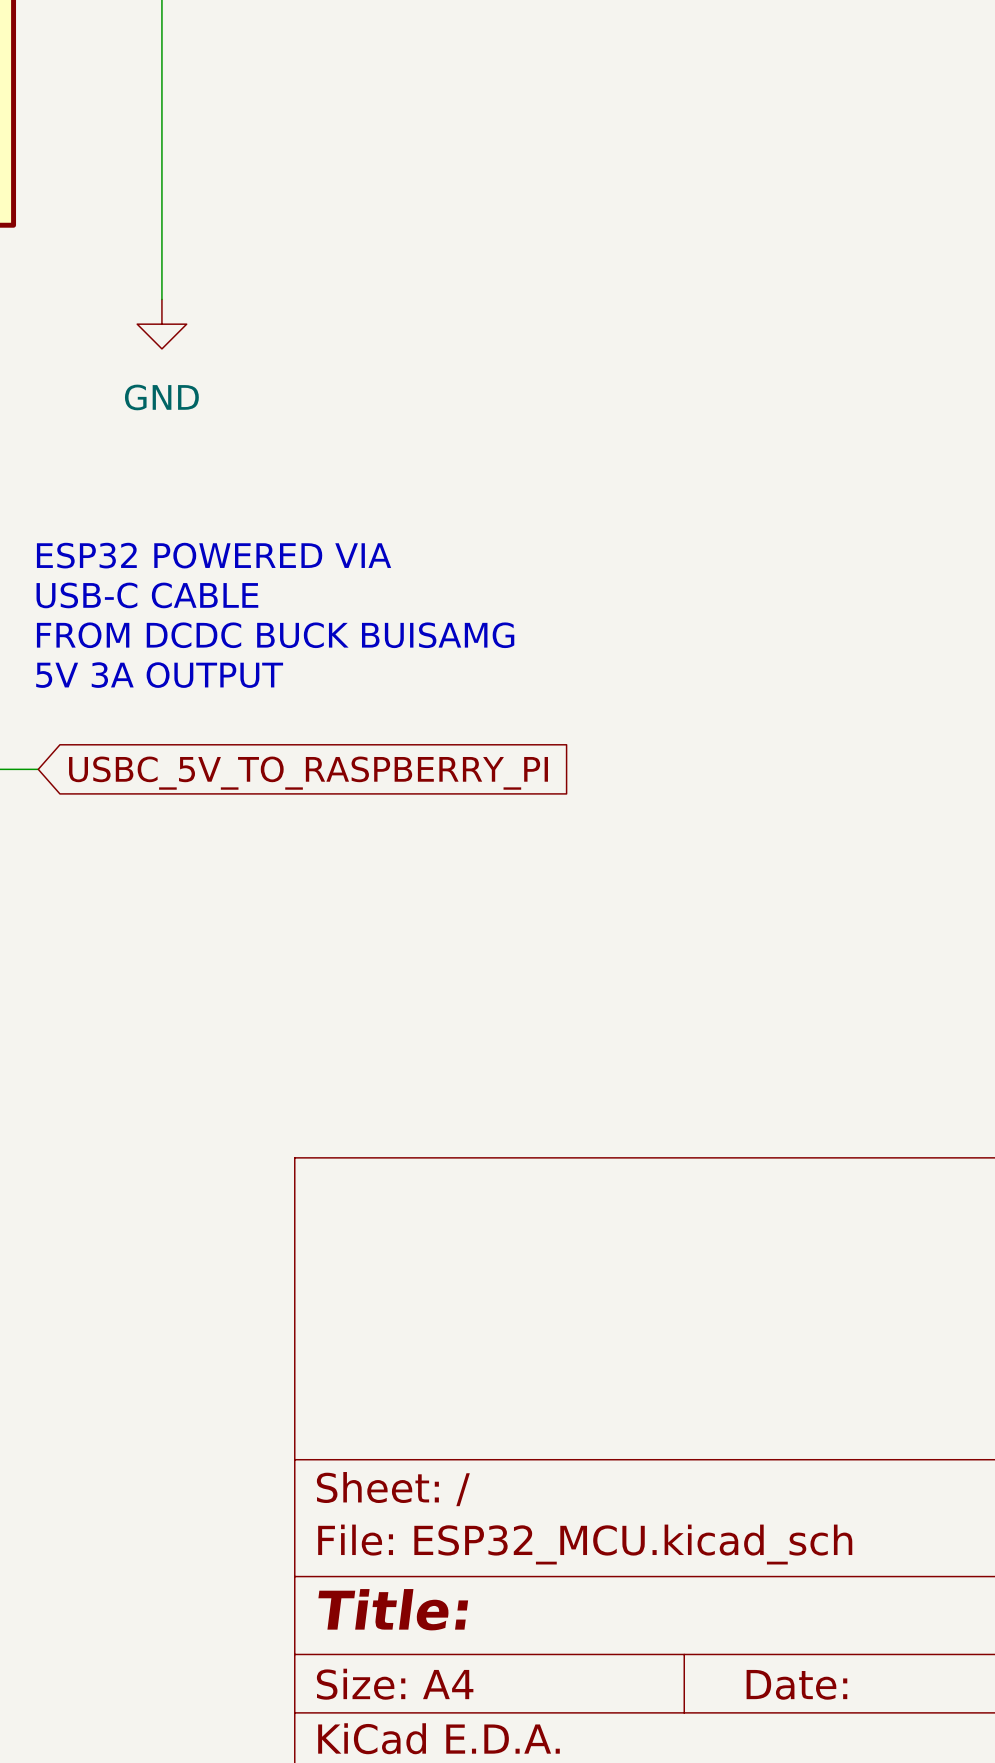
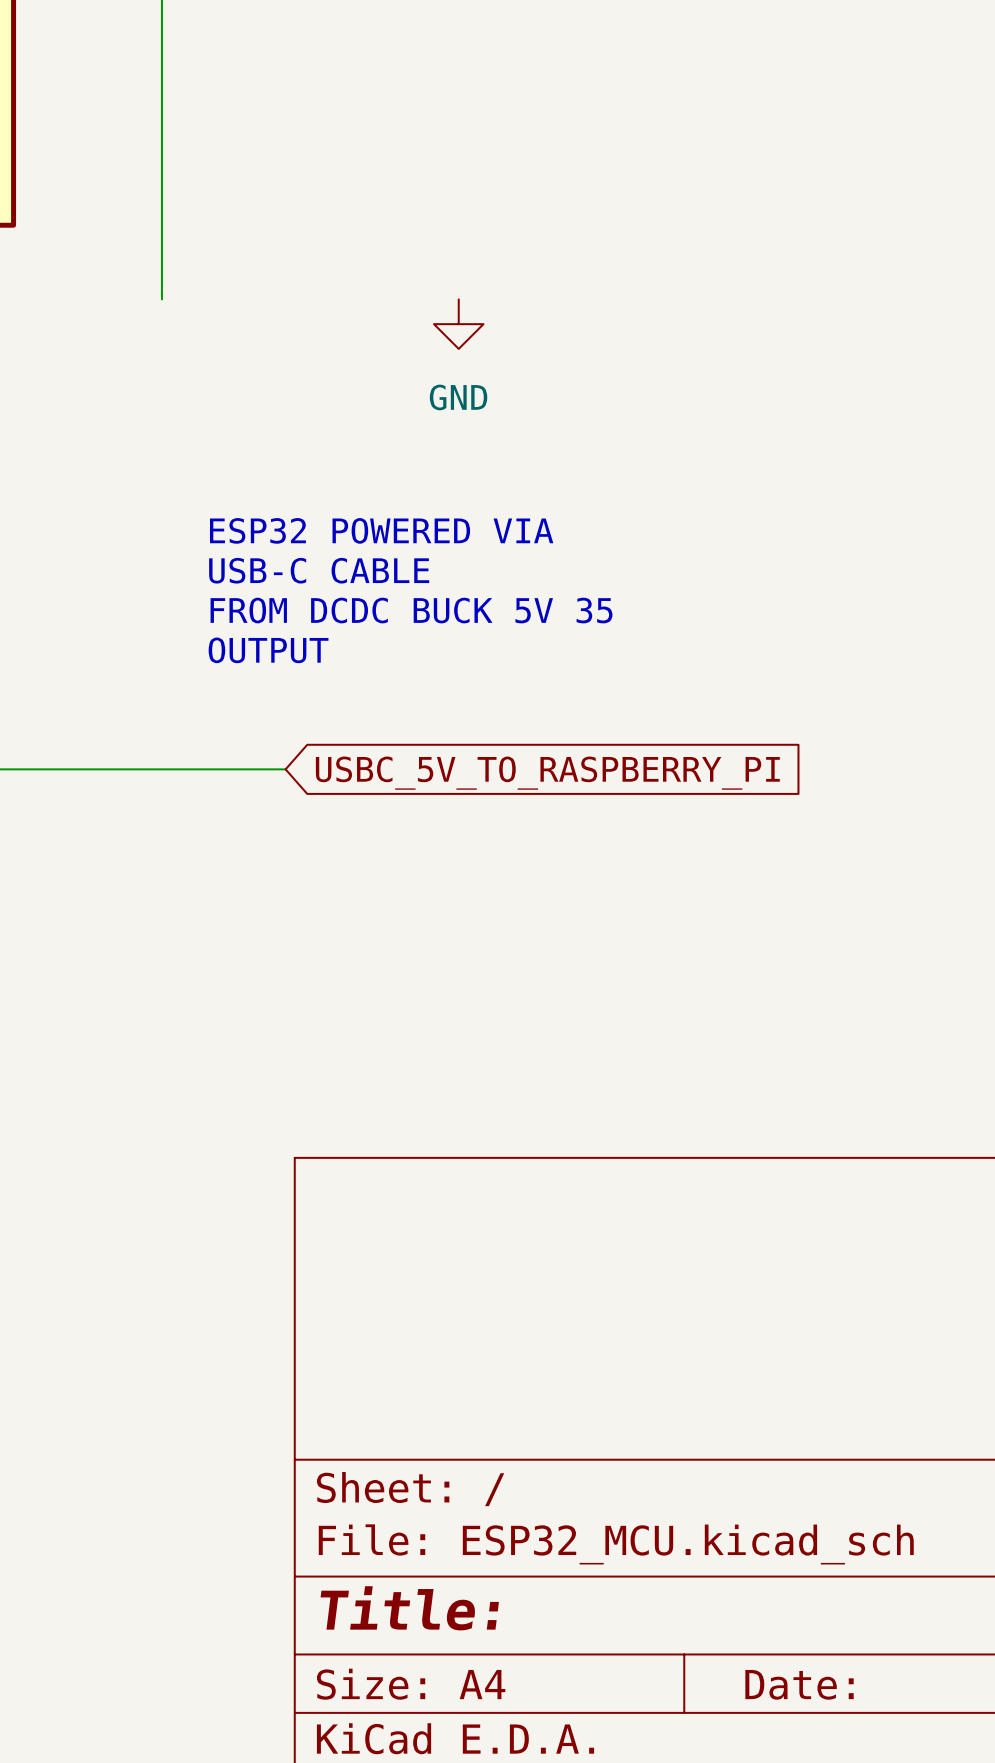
power symbol position: GND (161, 324) -> GND (458, 324)
text position: ESP32 POWERED VIA (214, 555) -> ESP32 POWERED VIA (381, 530)
text position: USB-C CABLE (147, 595) -> USB-C CABLE (319, 570)
text: FROM DCDC BUCK BUISAMG (275, 635) -> FROM DCDC BUCK 5V 35 (411, 610)
text: 5V 3A OUTPUT (159, 675) -> OUTPUT (268, 650)
wire: none -> (38, 769) (285, 769)
global label position: USBC_5V_TO_RASPBERRY_PI (308, 773) -> USBC_5V_TO_RASPBERRY_PI (547, 773)

